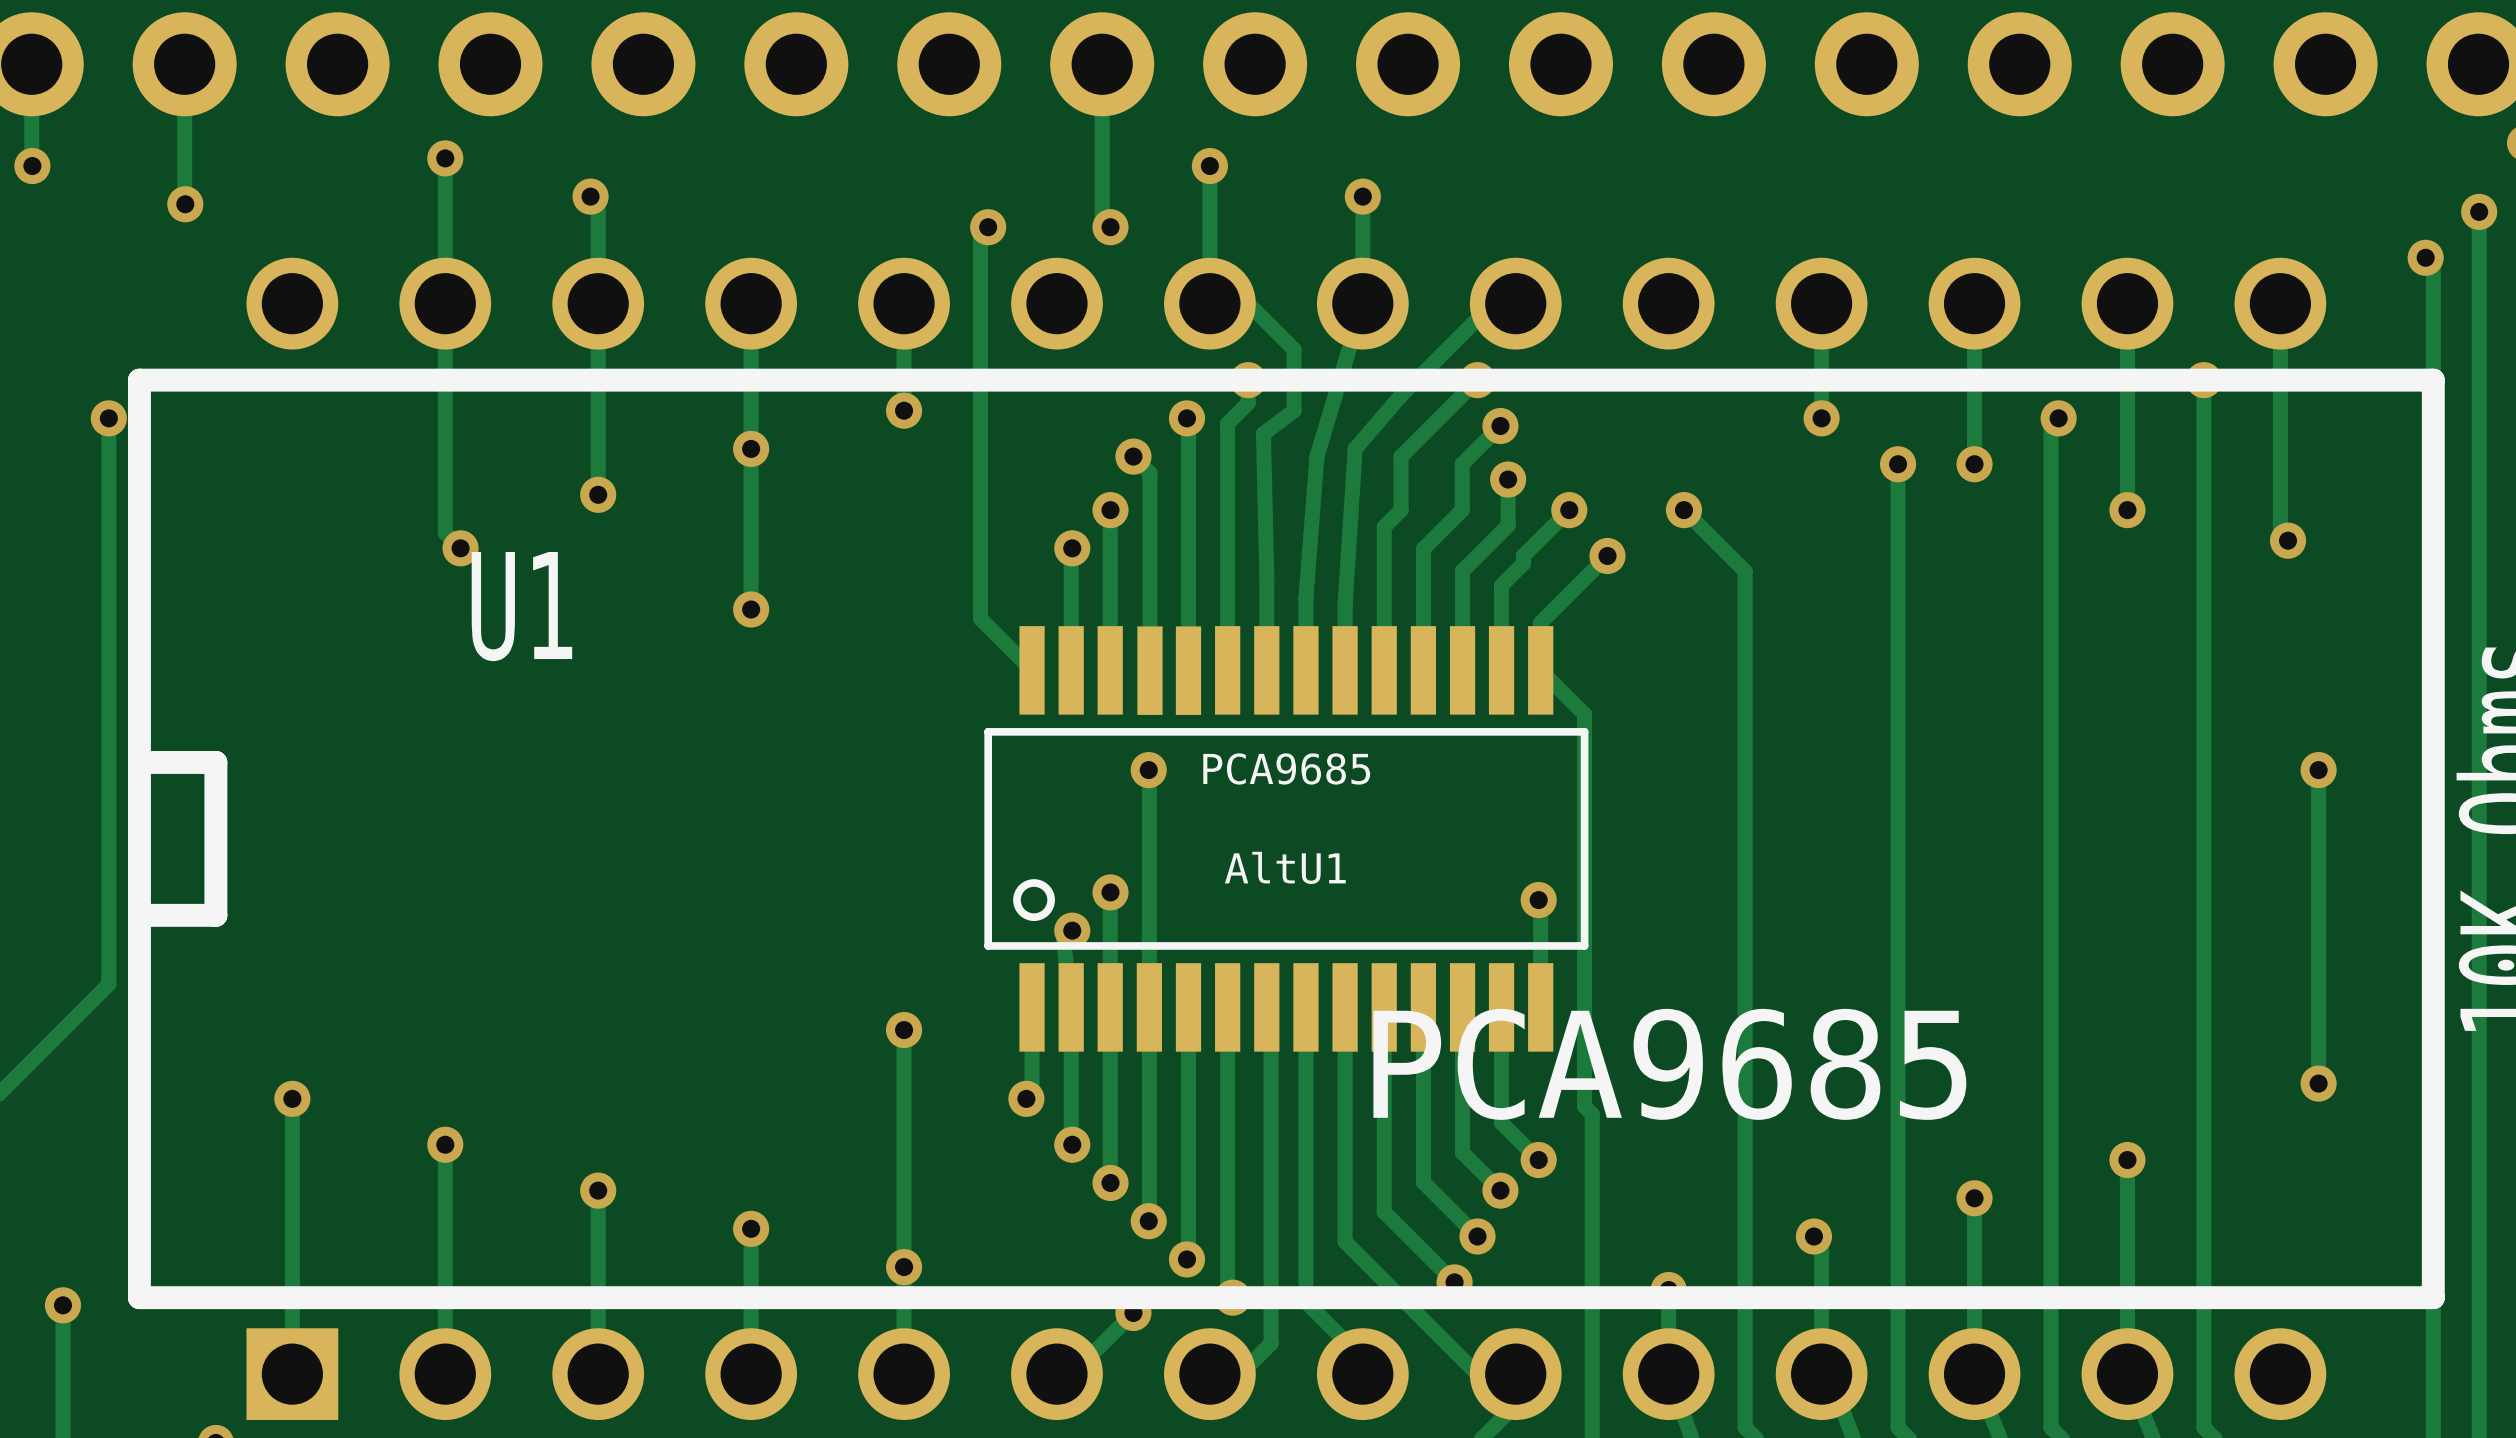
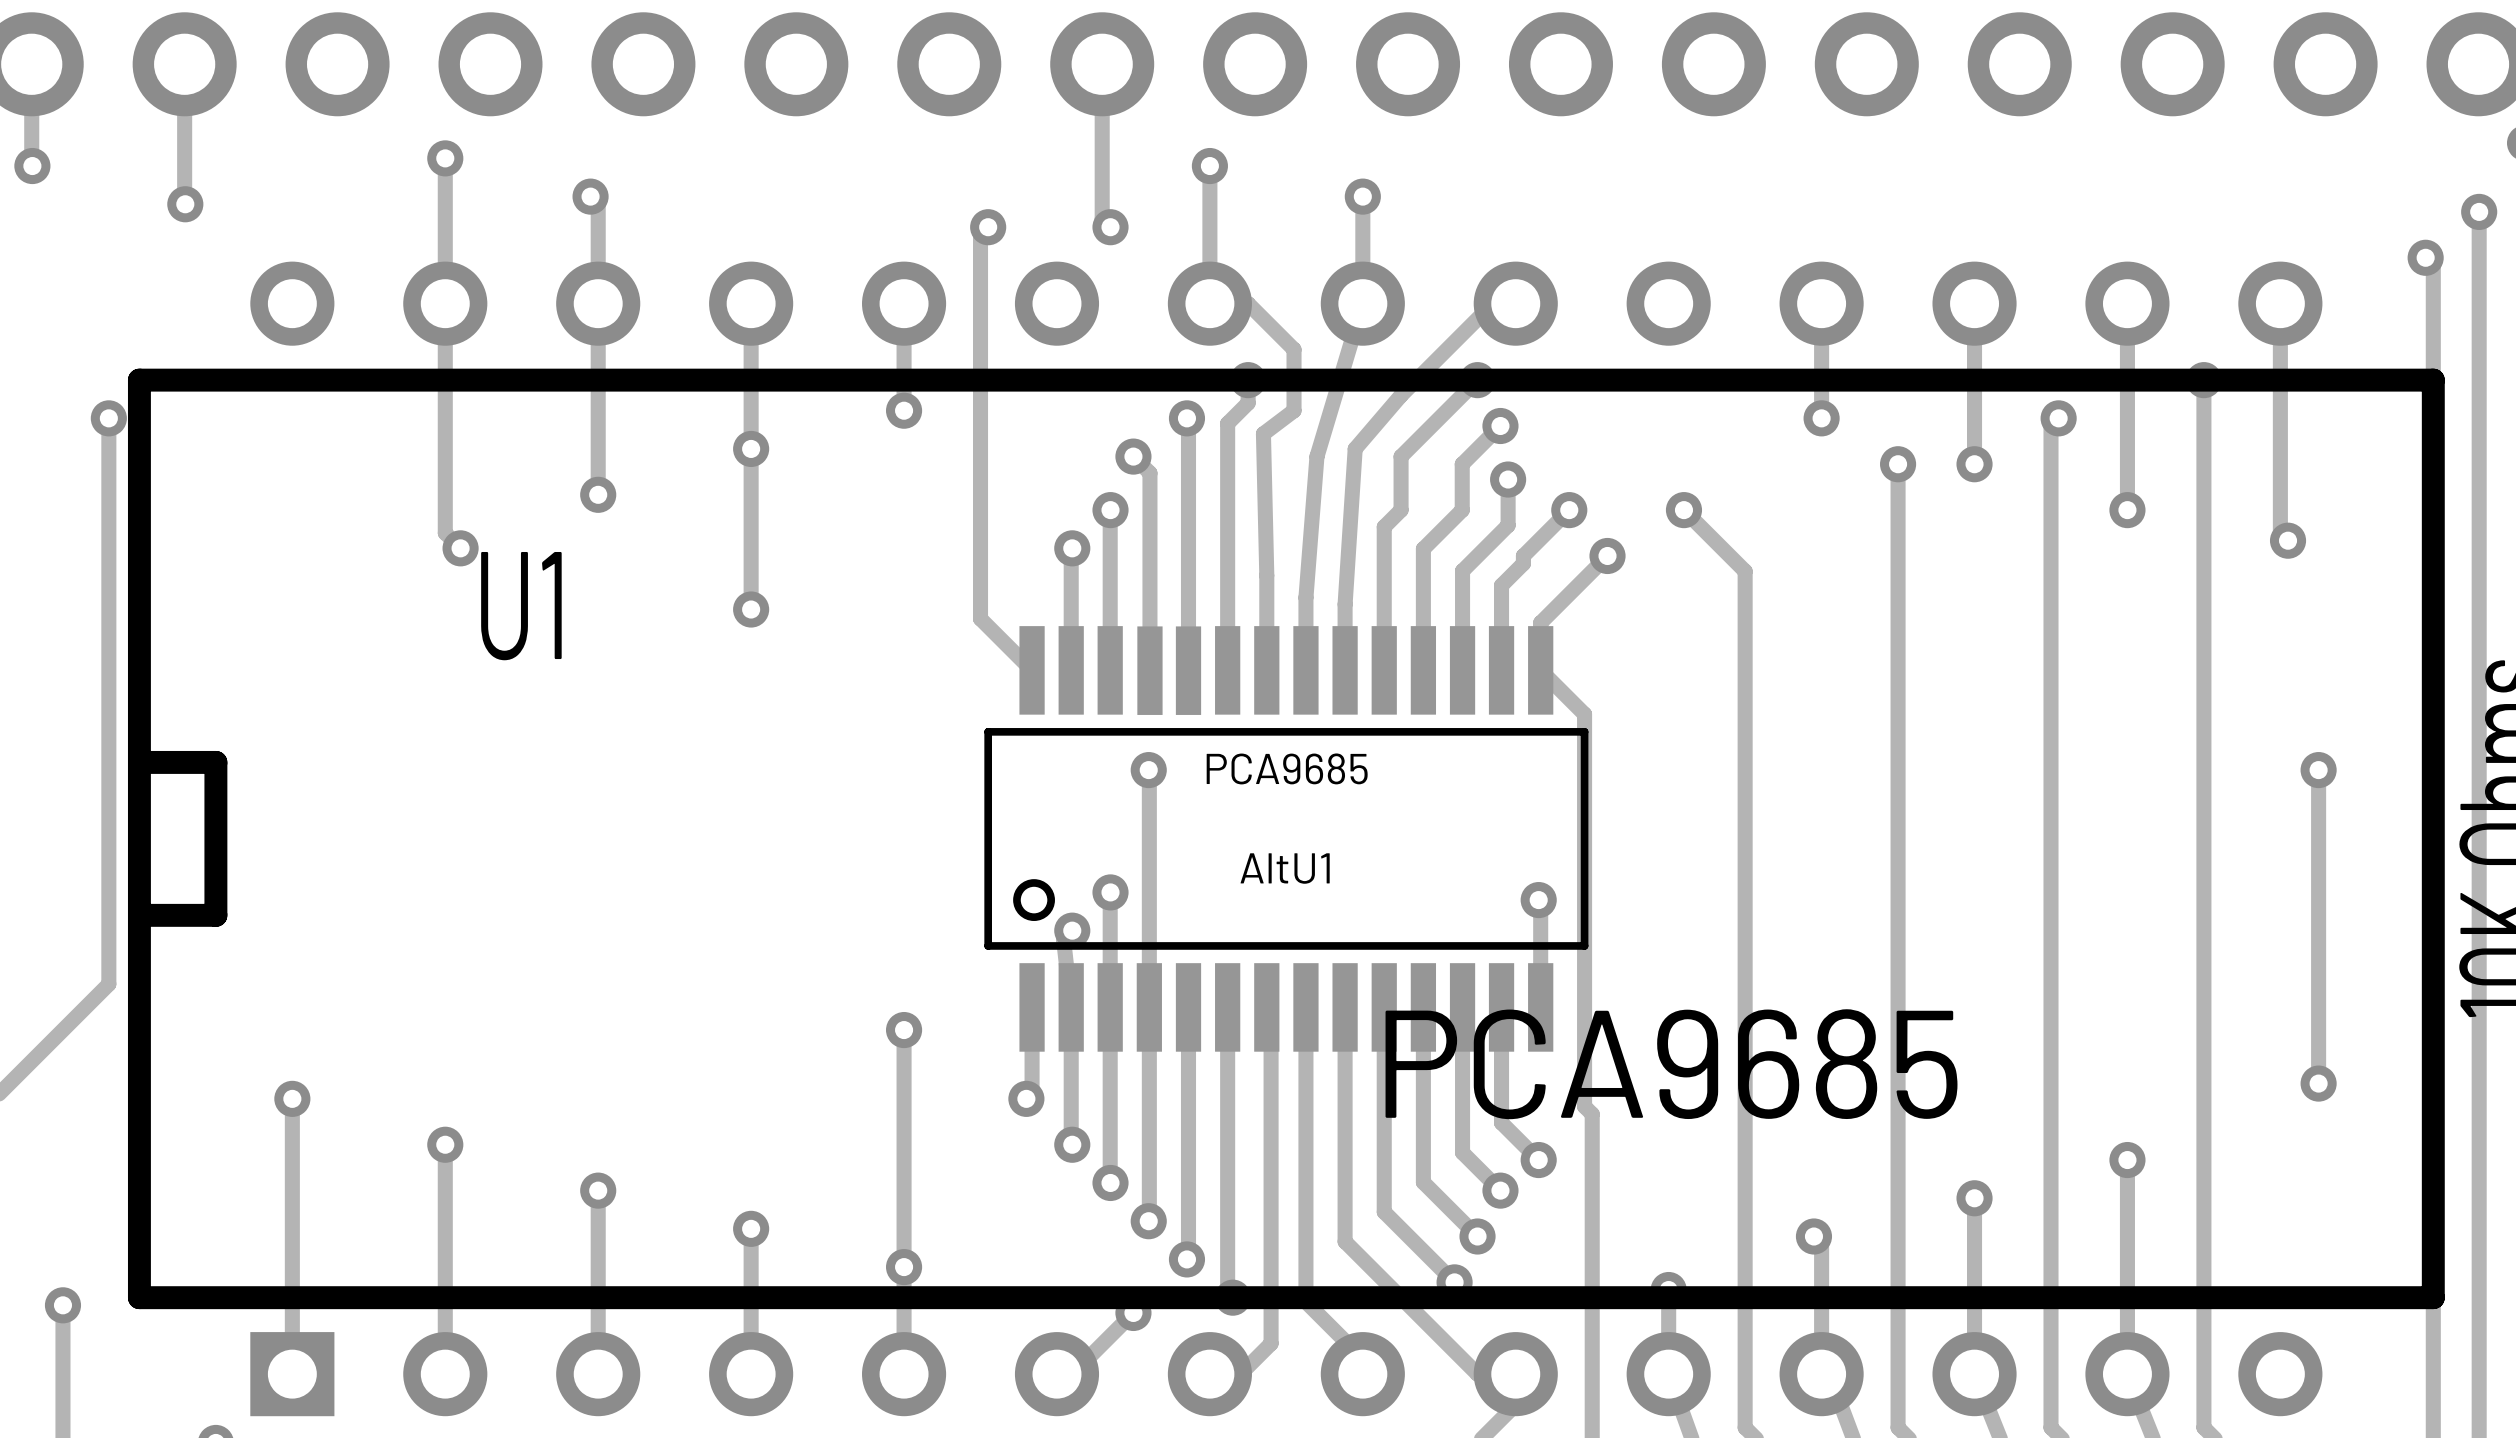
U1 footprint: [127, 257, 2445, 1421] -> [127, 261, 2445, 1417]

